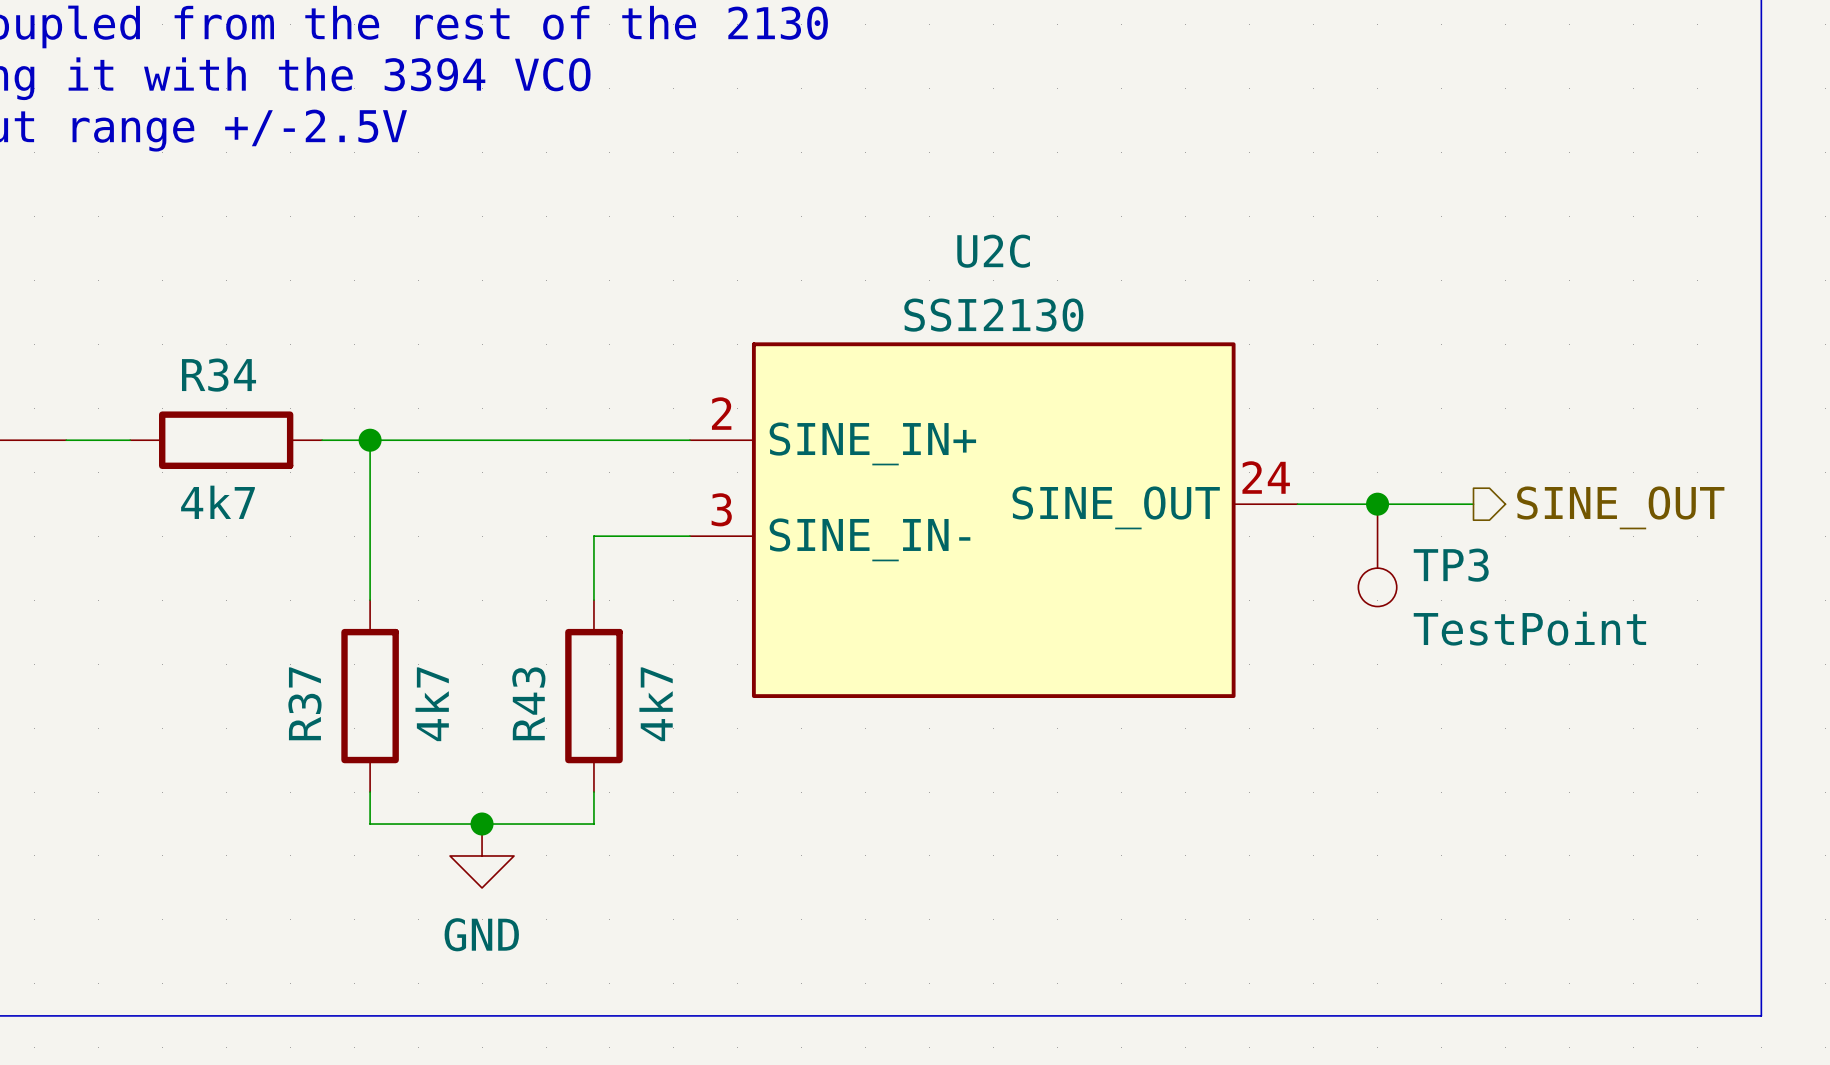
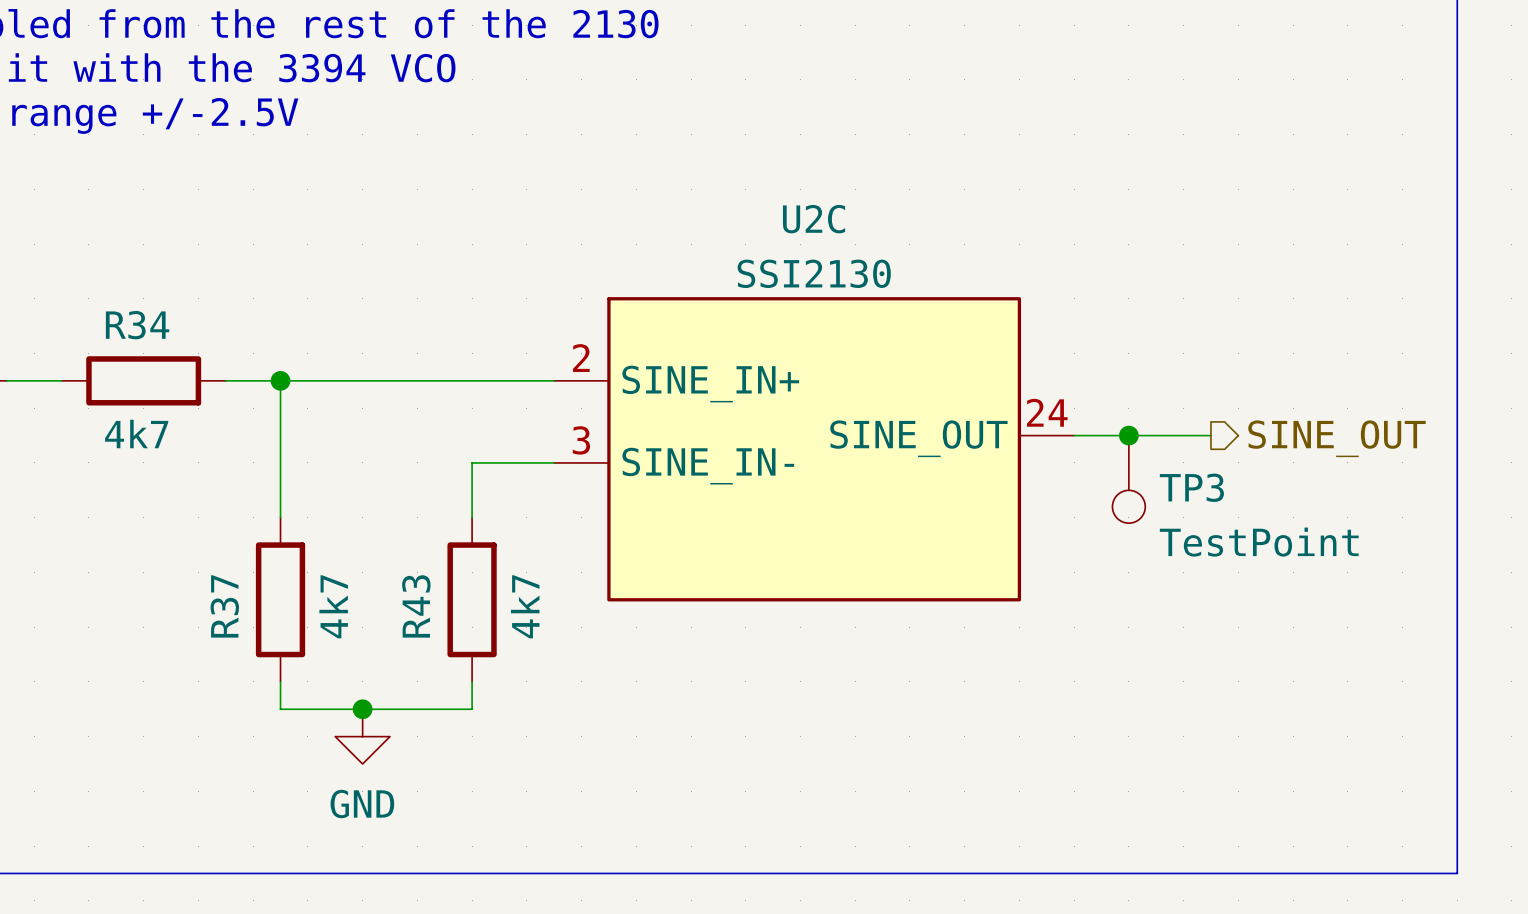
wire: (370, 440) (370, 600) -> (280, 380) (280, 517)
junction position: (370, 440) -> (280, 380)
U2C position: (993, 520) -> (814, 449)
wire: (609, 536) (593, 536) (593, 600) -> (472, 462) (472, 517)
R37 position: (370, 696) -> (280, 599)
R43 position: (593, 696) -> (472, 599)
wire: (370, 792) (370, 824) (386, 824) -> (280, 681) (280, 709)
wire: (593, 792) (593, 824) -> (472, 681) (472, 709) (458, 709)

